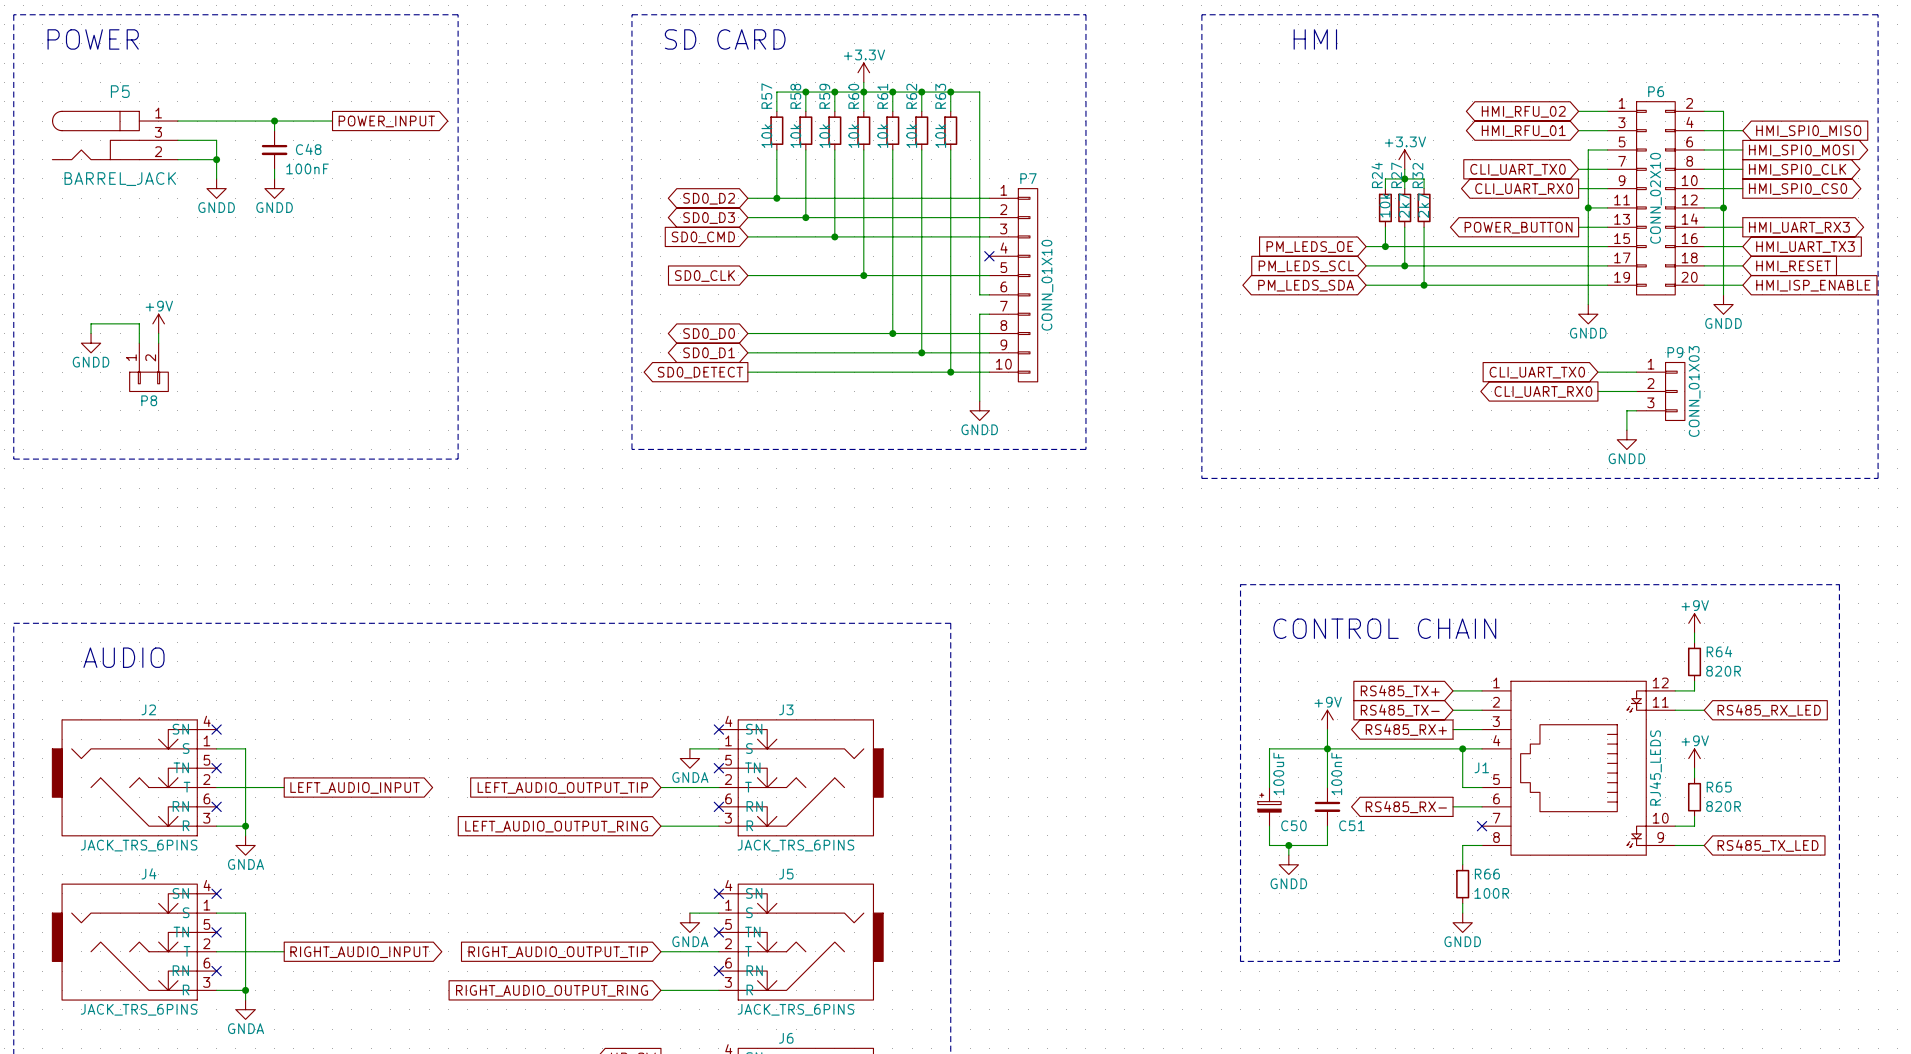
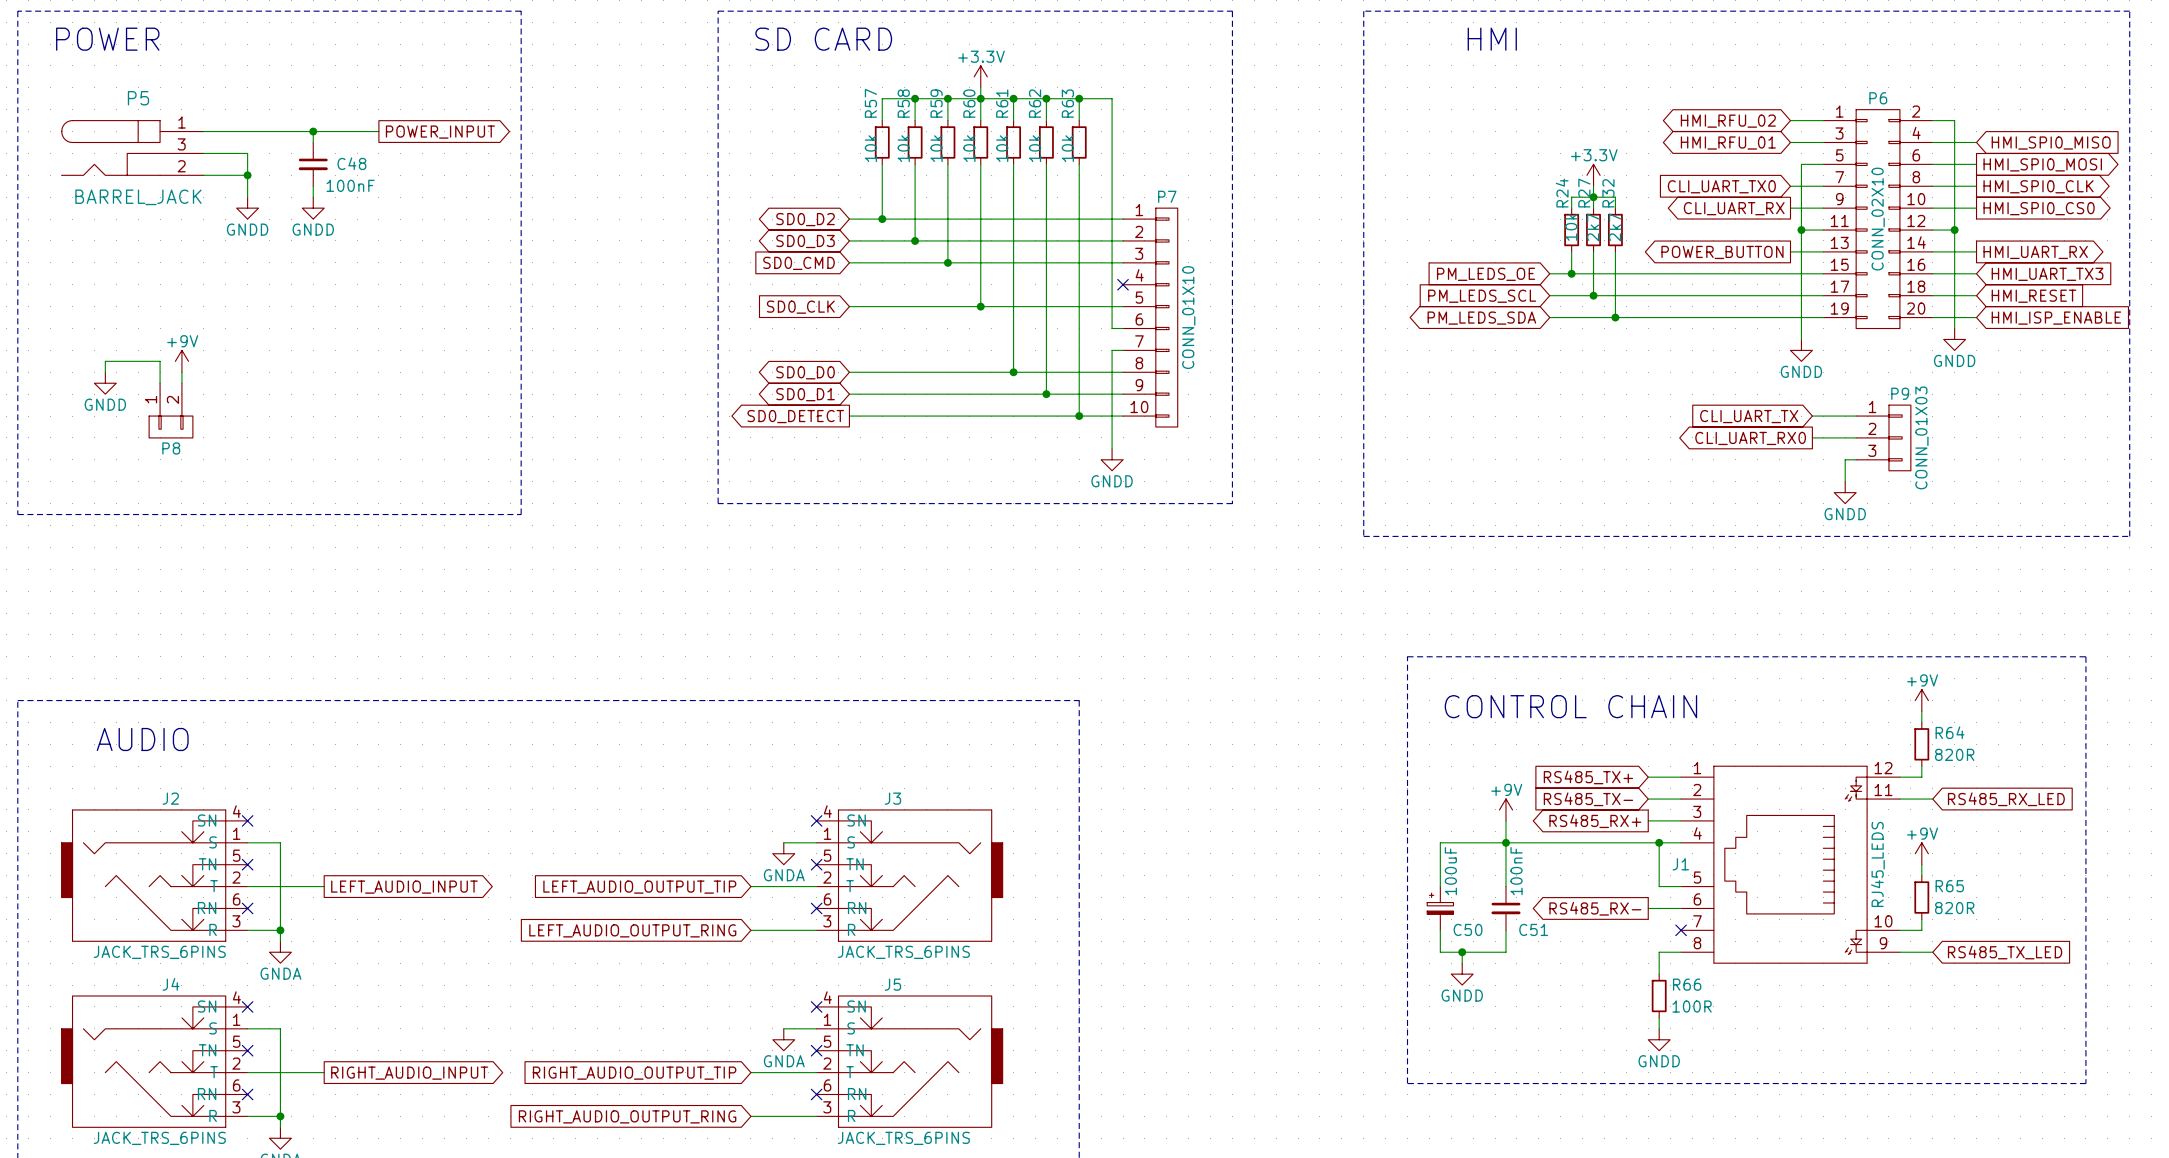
global label: CLI_UART_RX0 (1524, 189) -> CLI_UART_RX (1734, 208)
global label: HMI_UART_RX3 (1799, 227) -> HMI_UART_RX (2035, 252)
global label: CLI_UART_TX0 (1537, 372) -> CLI_UART_TX (1749, 416)

